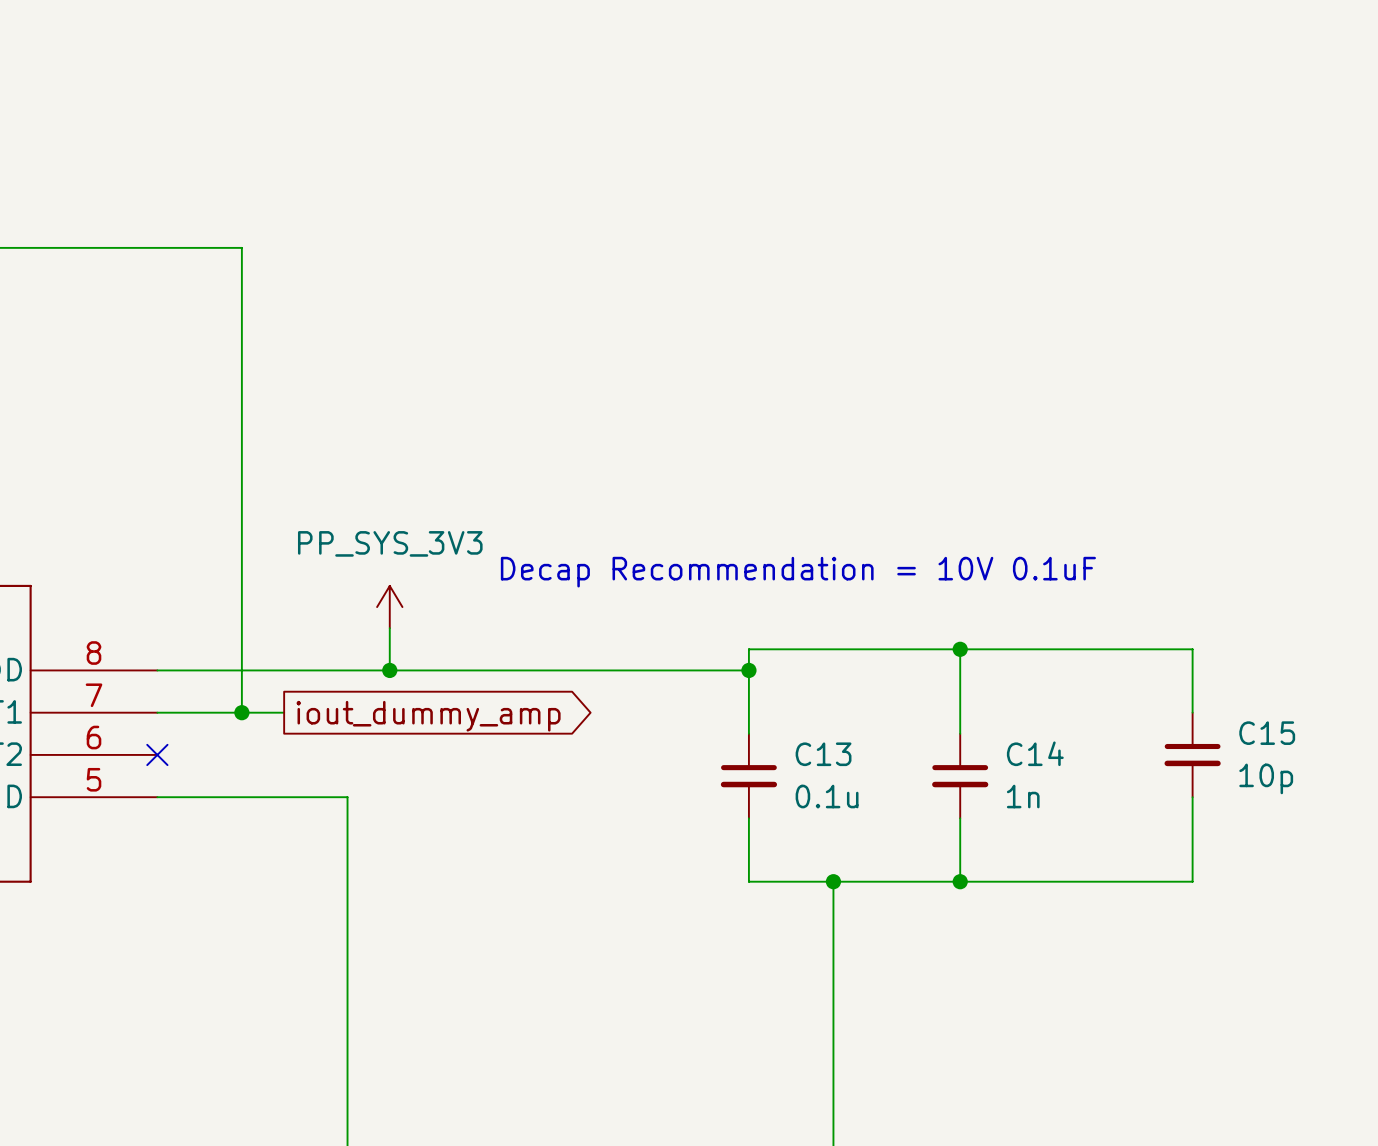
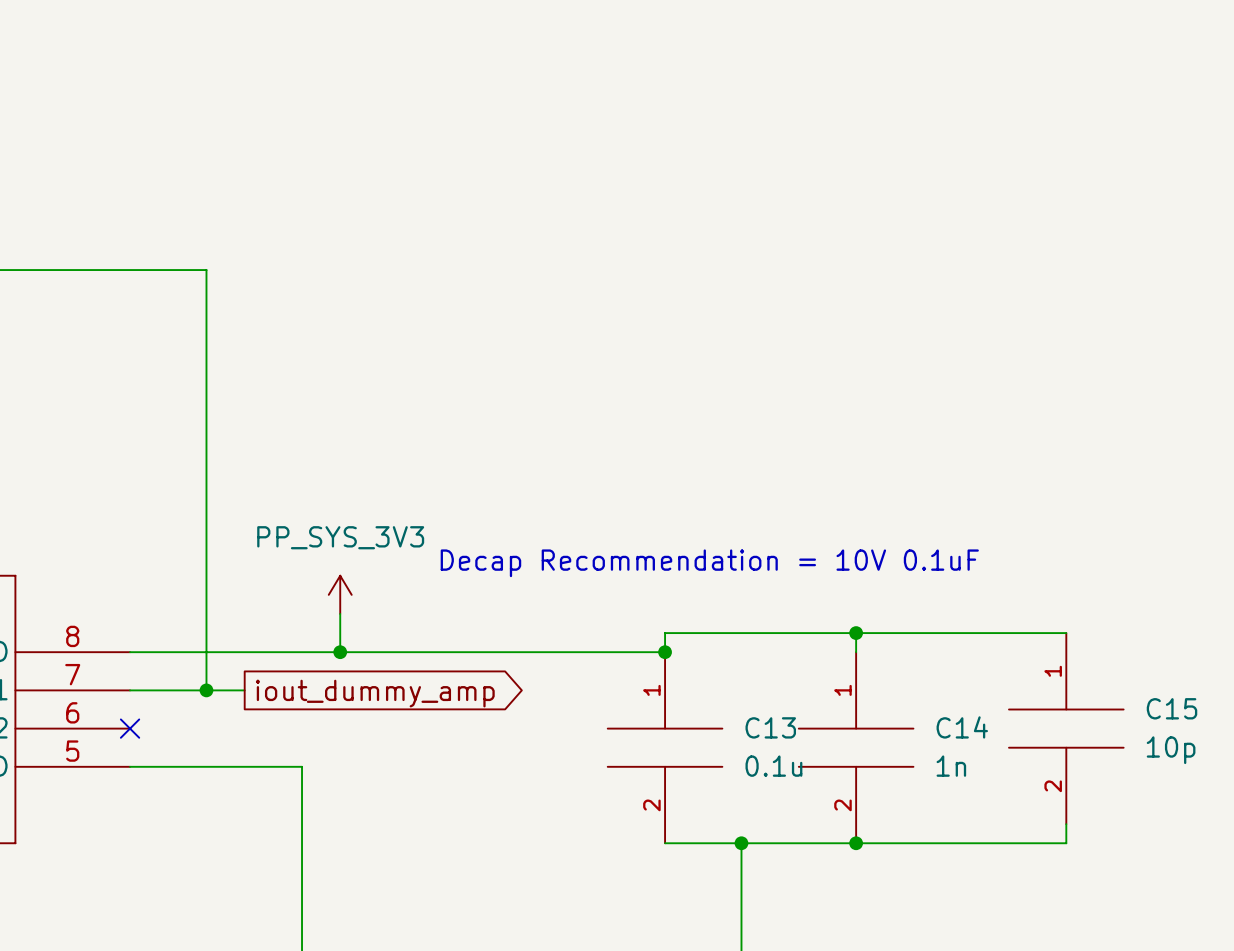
C15 symbol: [1164, 712, 1221, 798] -> [1008, 633, 1124, 825]
C13 symbol: [720, 733, 778, 819] -> [607, 652, 723, 844]
C14 symbol: [932, 733, 989, 819] -> [798, 652, 914, 844]
C15 name position: C15 (1267, 733) -> C15 (1171, 708)
C14 name position: C14 (1035, 753) -> C14 (962, 727)
C13 name position: C13 (823, 754) -> C13 (770, 727)
C15 value position: 10p (1266, 778) -> 10p (1171, 750)
C13 value position: 0.1u (827, 796) -> 0.1u (773, 766)
C14 value position: 1n (1023, 796) -> 1n (951, 766)

